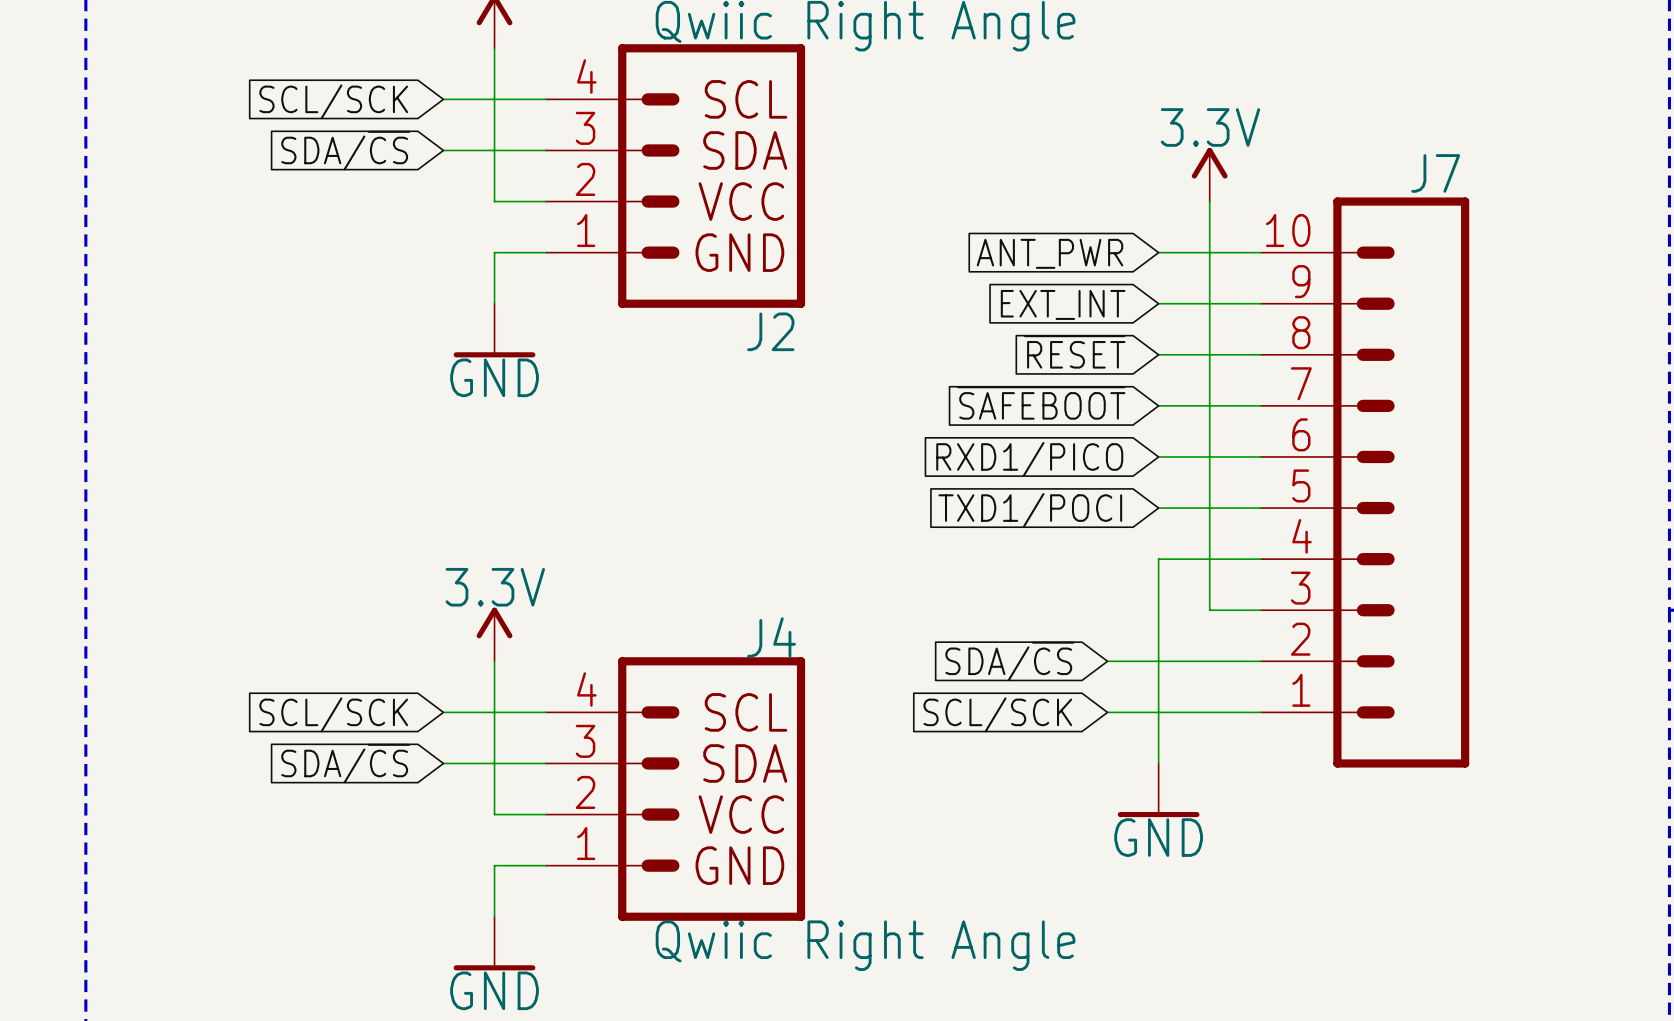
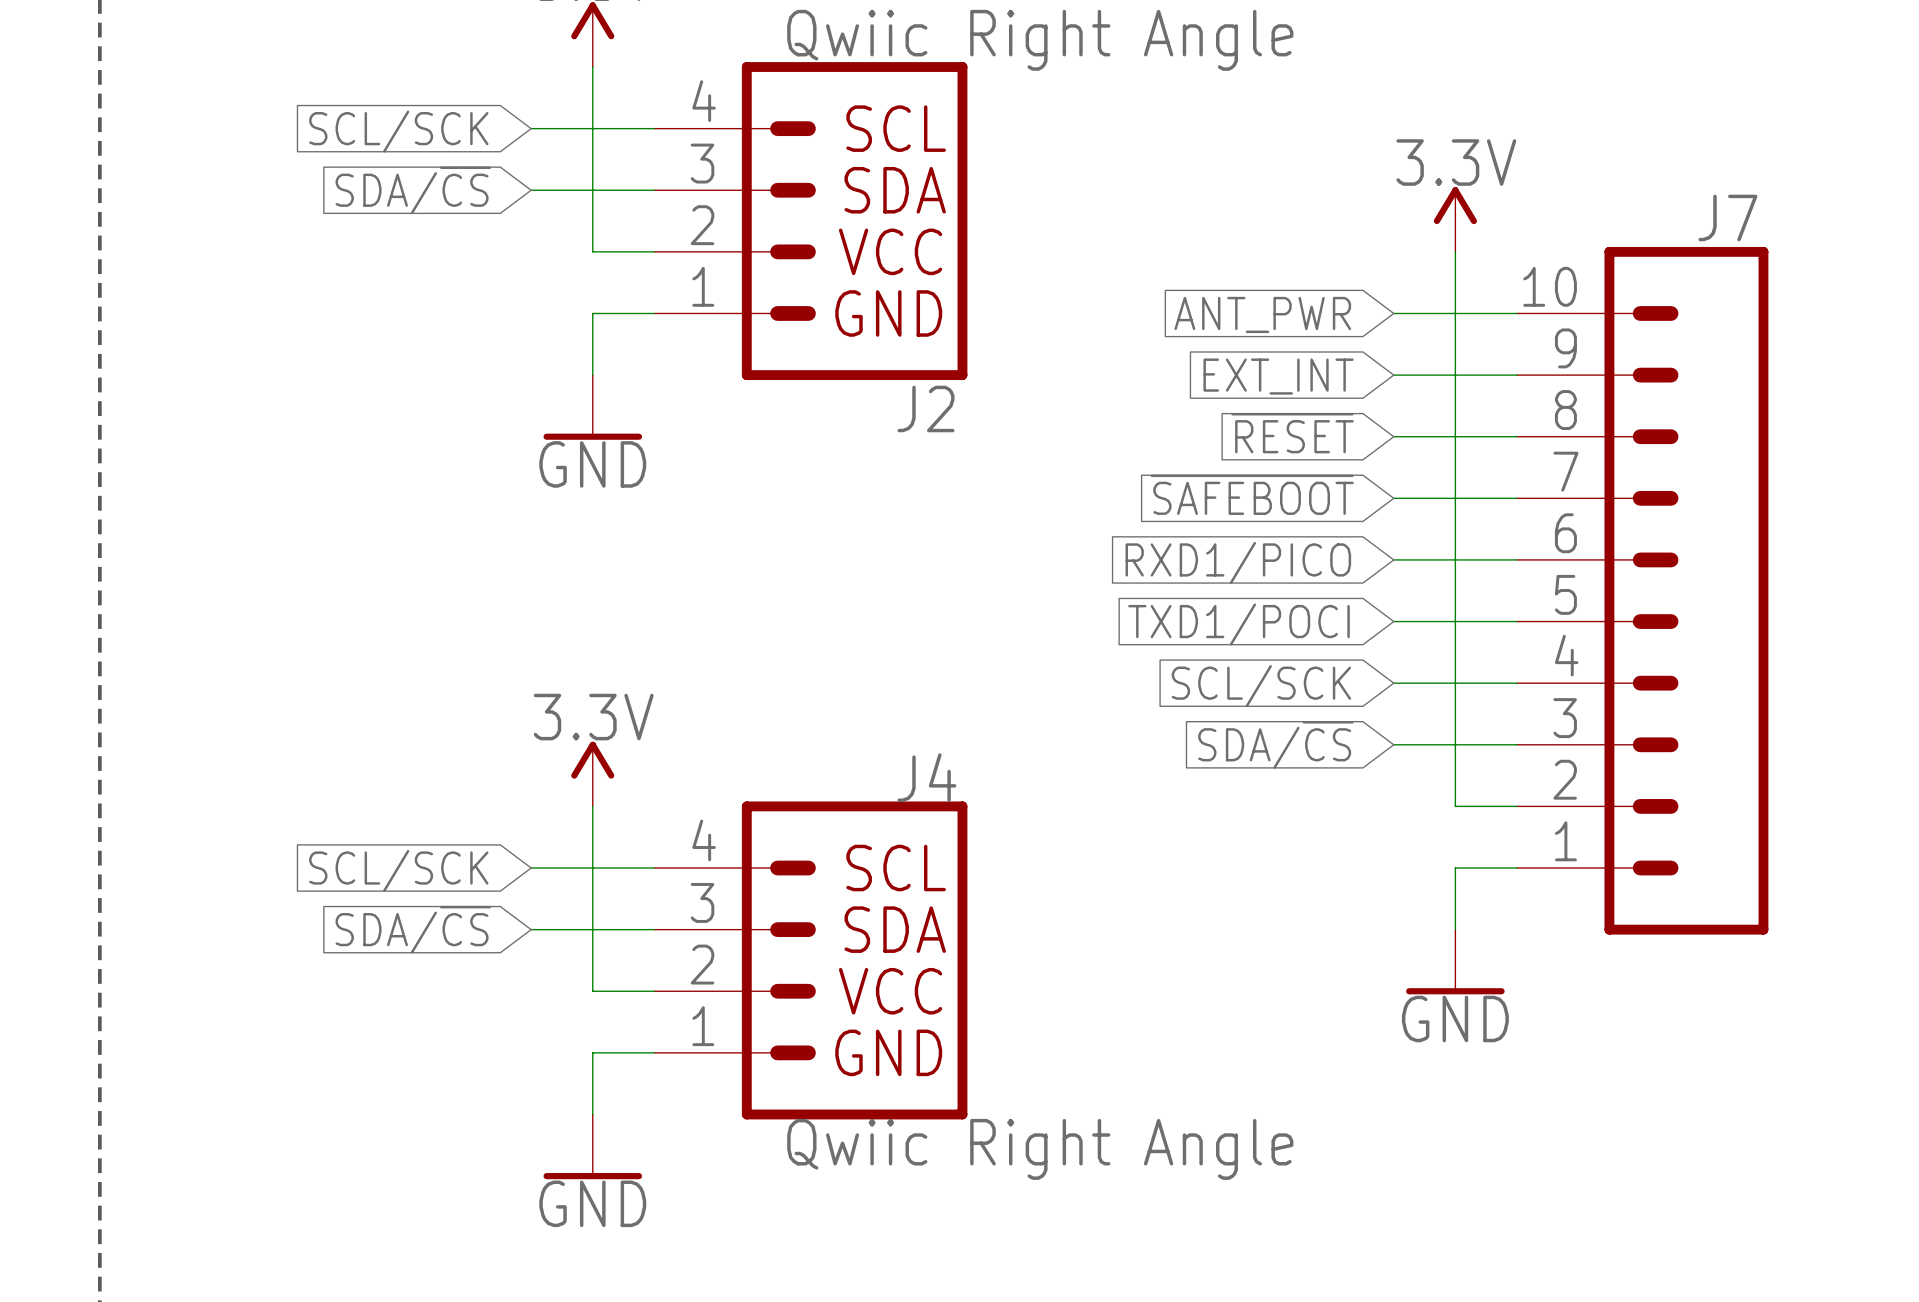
wire: (1158, 559) (1158, 763) -> none
global label position: SDA/~{CS} (1009, 661) -> SDA/~{CS} (1275, 744)
wire: (1107, 661) (1209, 661) -> (1393, 744) (1455, 744) (1455, 806)
wire: (1107, 712) (1209, 712) -> (1455, 929) (1455, 868)
global label position: SCL/SCK (997, 714) -> SCL/SCK (1261, 686)
power symbol position: GND (1158, 790) -> GND (1455, 961)

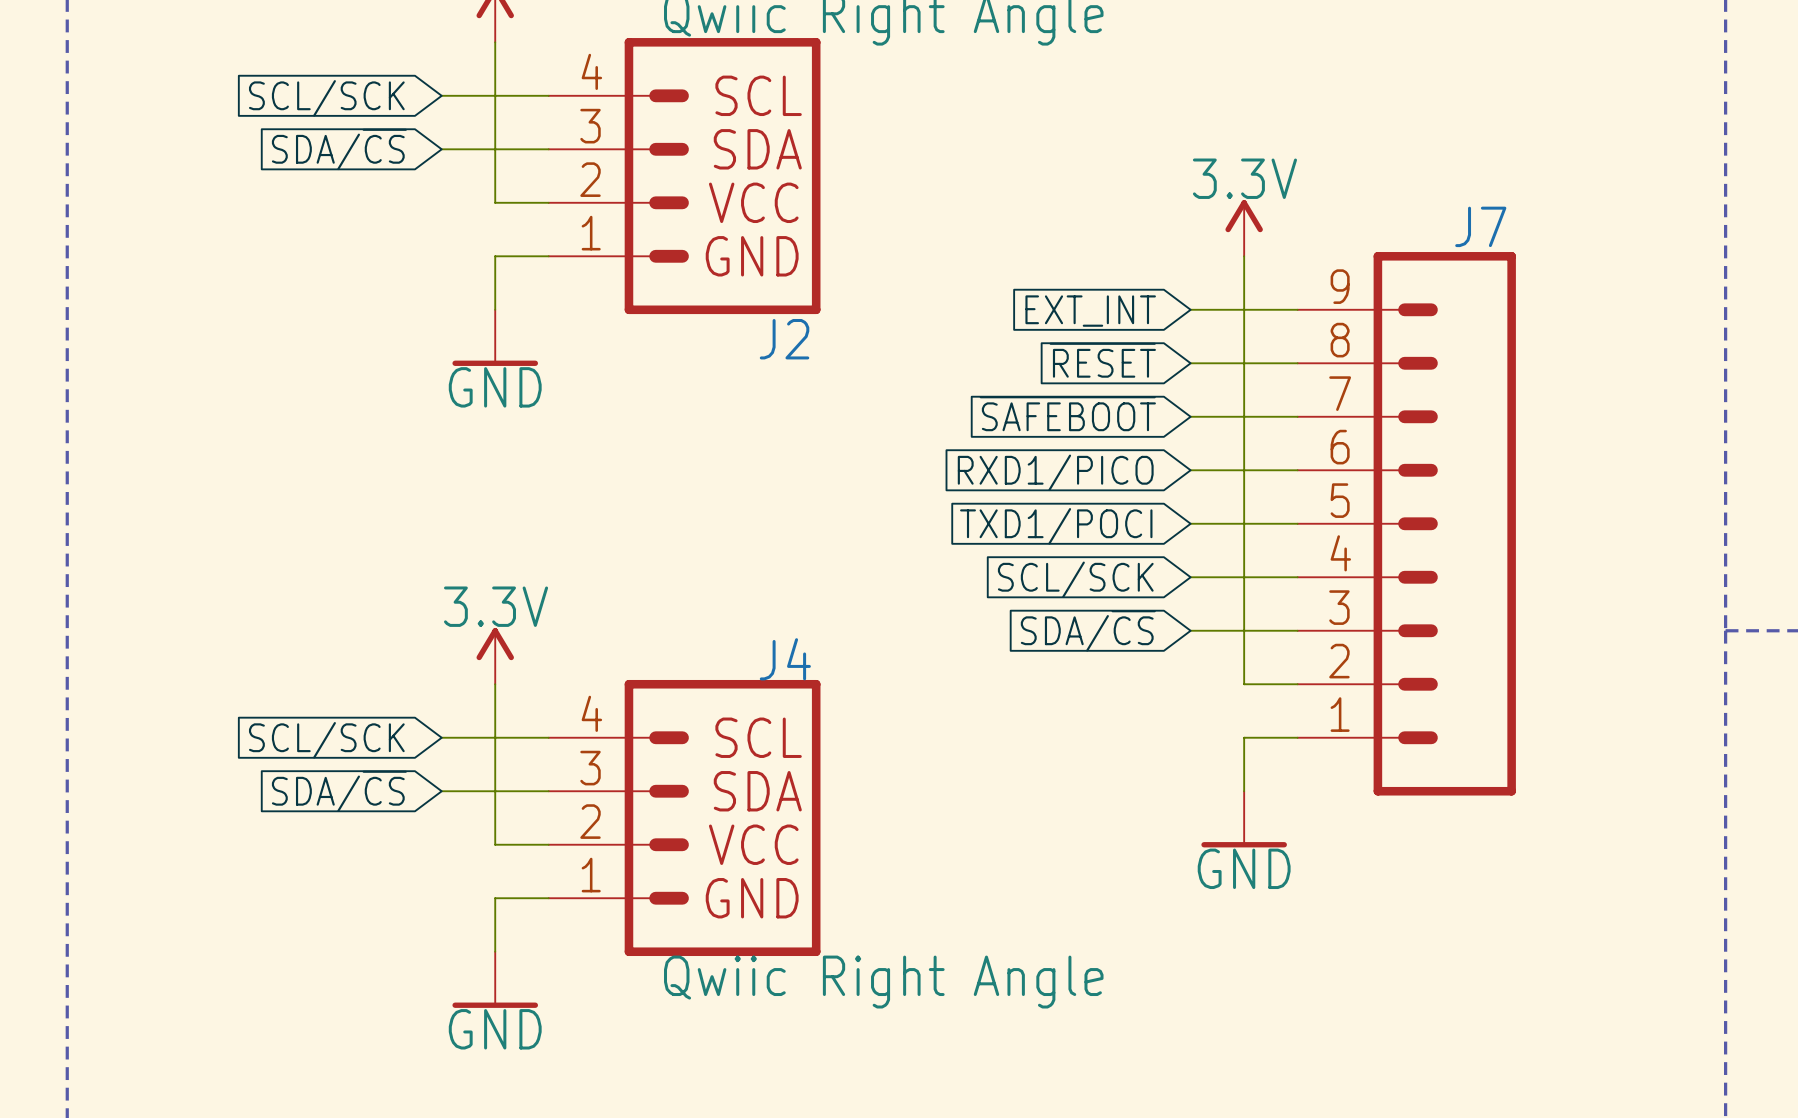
power symbol position: 3.3V (1455, 219) -> 3.3V (1244, 228)
J7 symbol: [1517, 246, 1769, 935] -> [1297, 252, 1516, 796]
wire: (1393, 313) (1517, 313) -> none
global label: ANT_PWR (1262, 314) -> none

